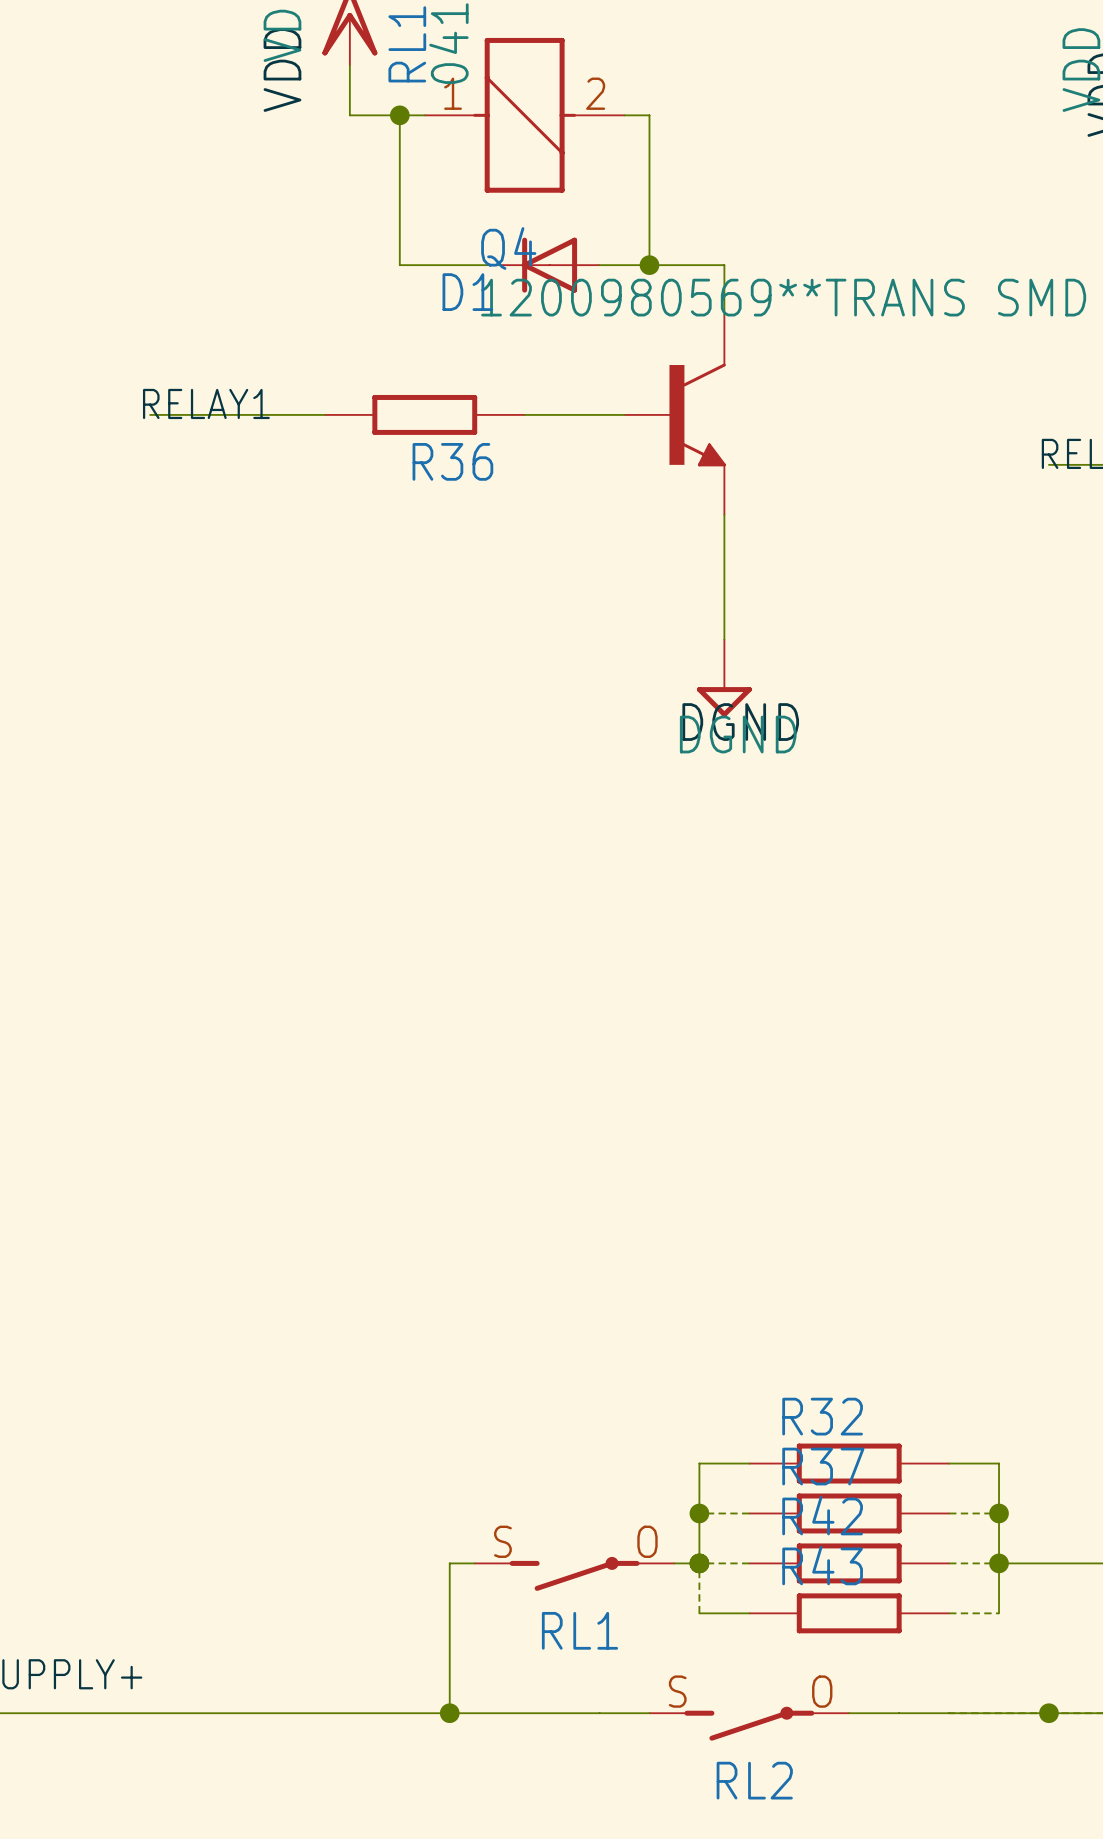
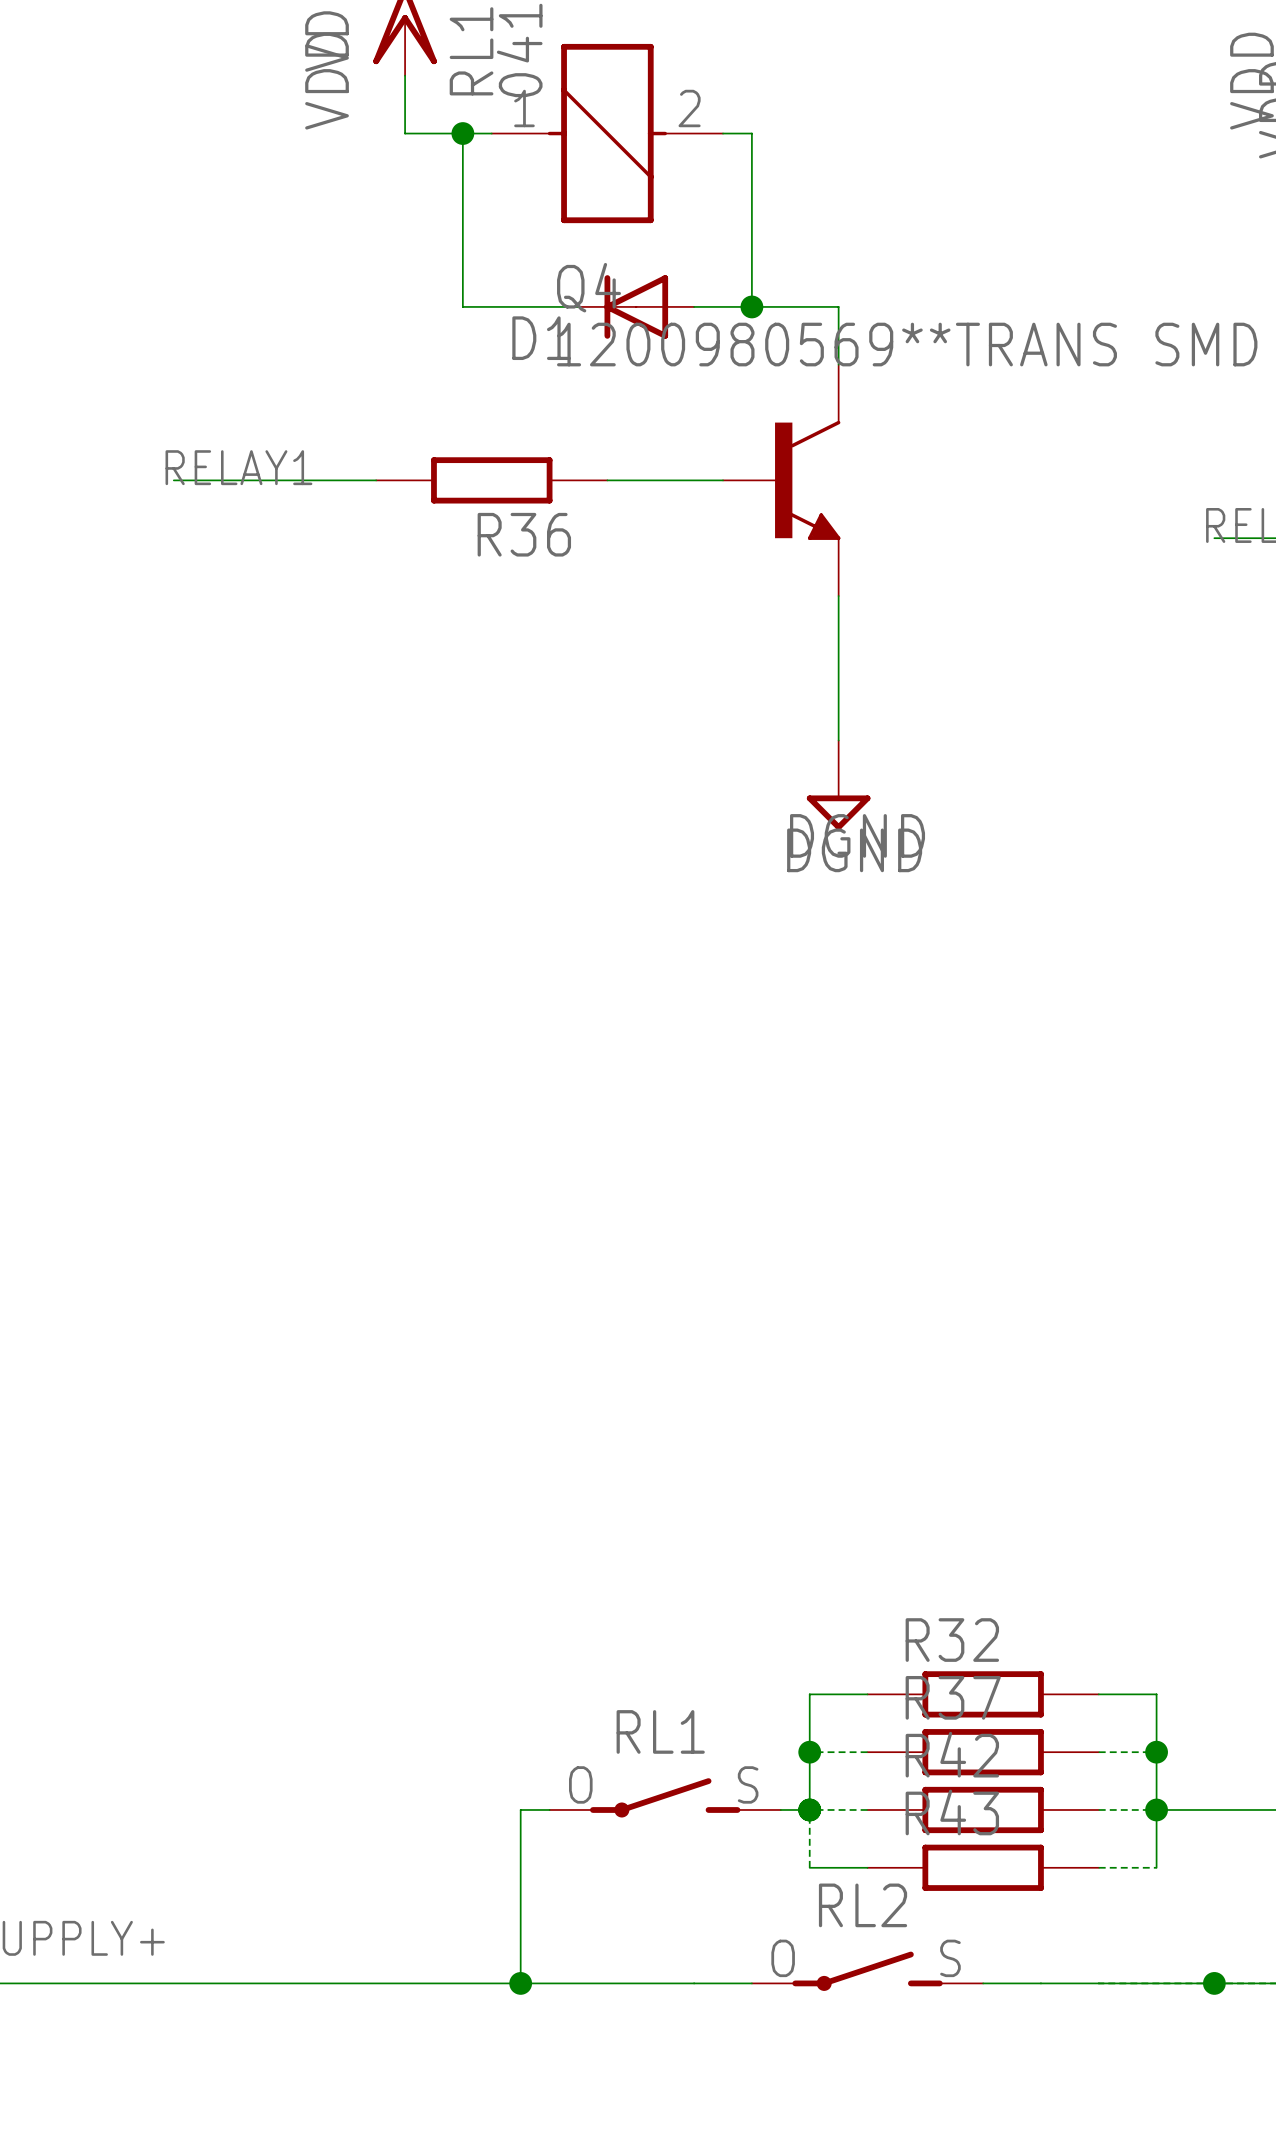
RL1 rotation: 0° (574, 1573) -> 180° (665, 1797)
RL2 rotation: 0° (749, 1723) -> 180° (867, 1971)

